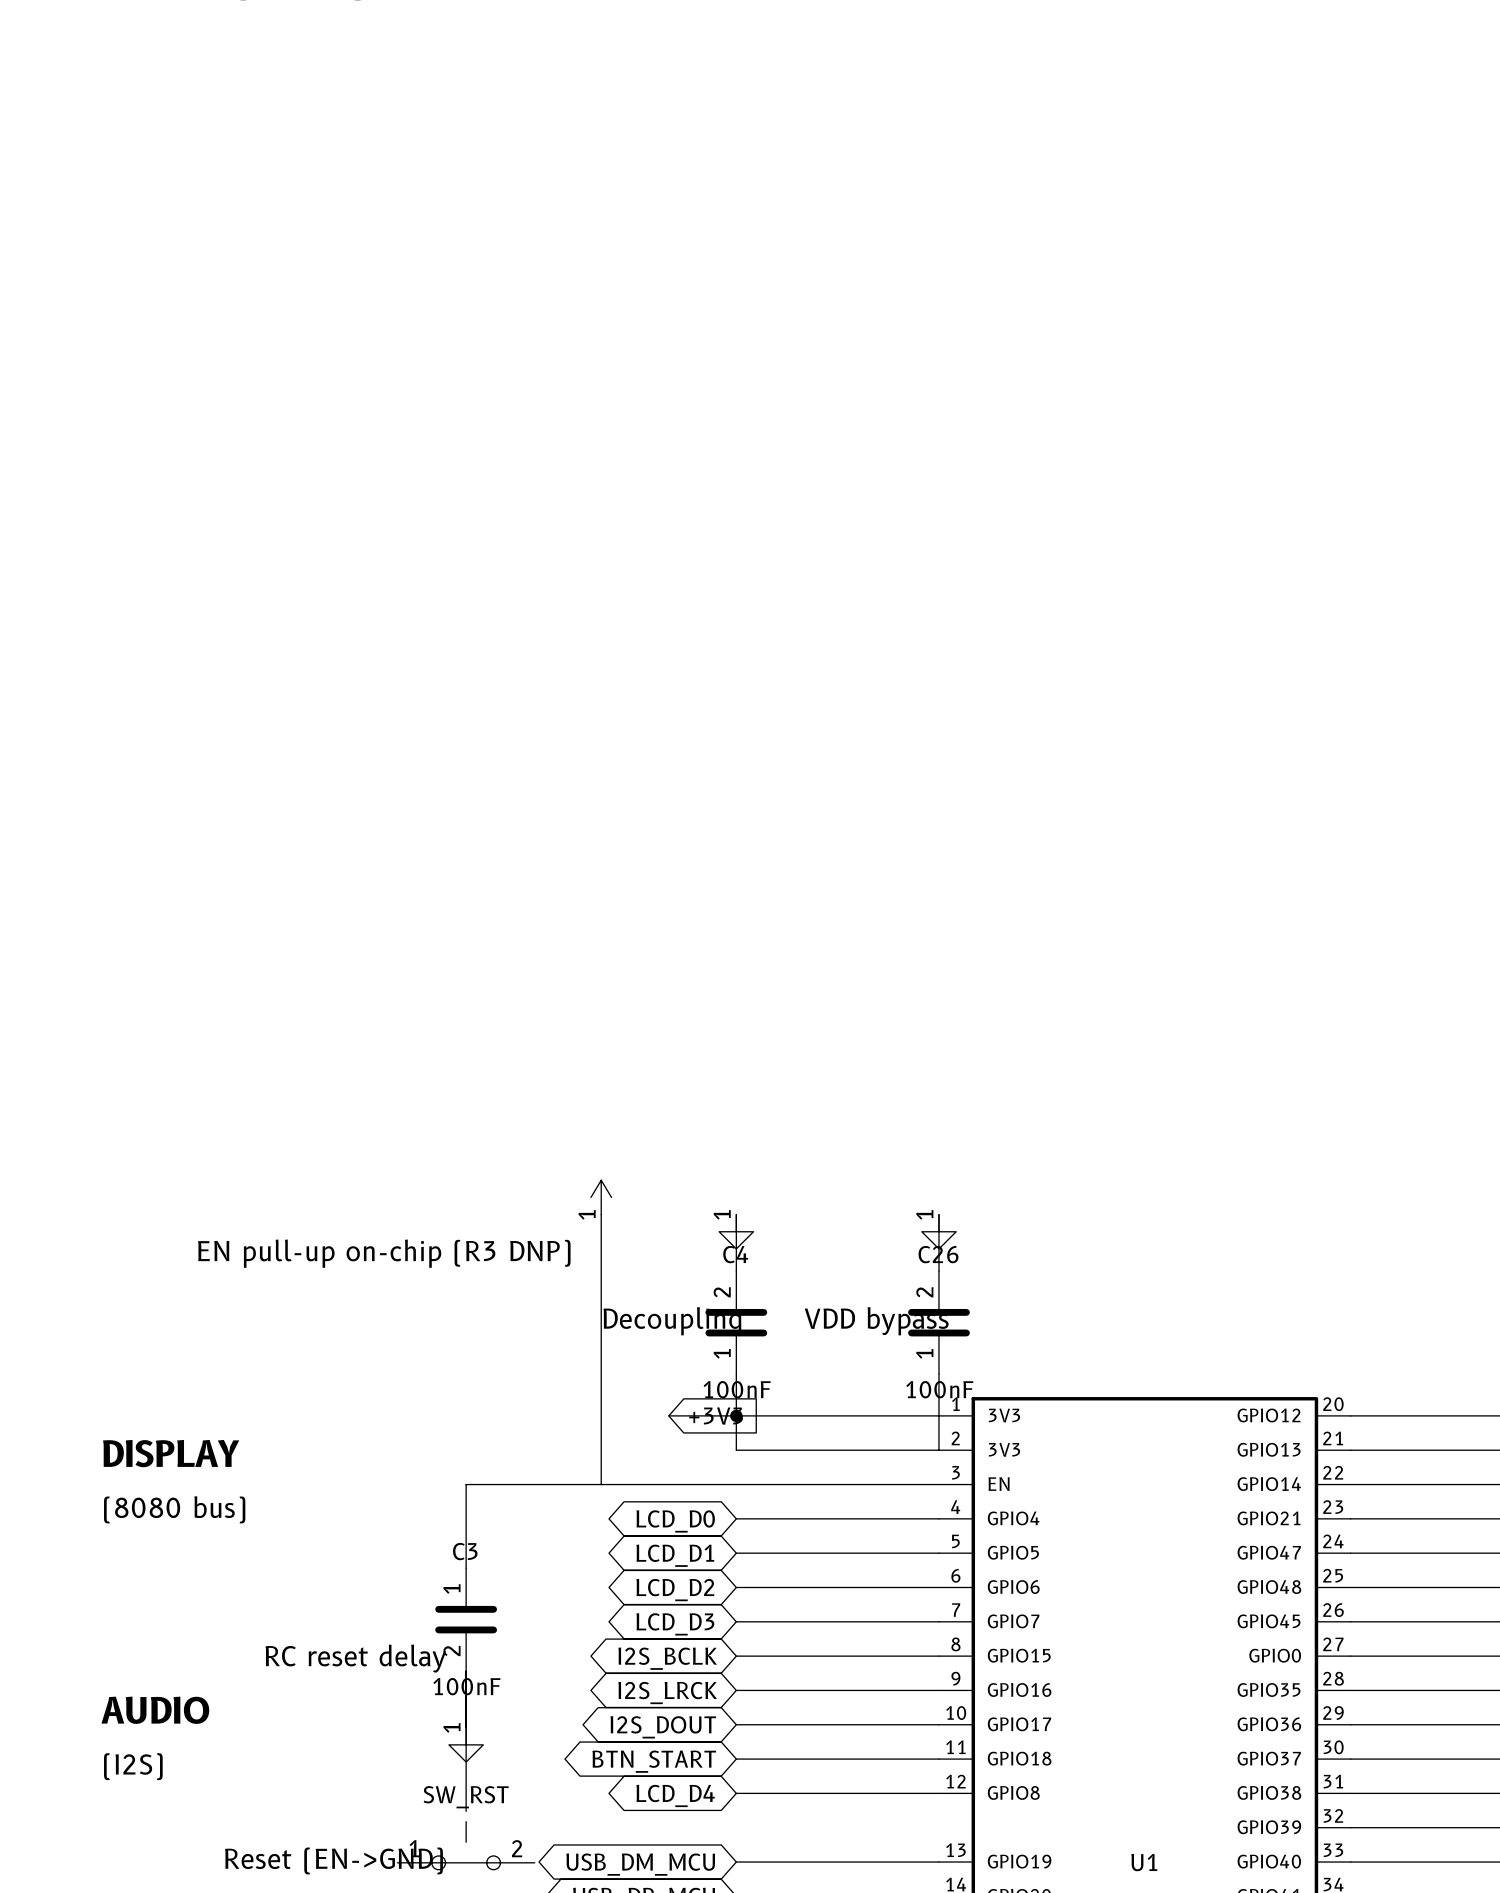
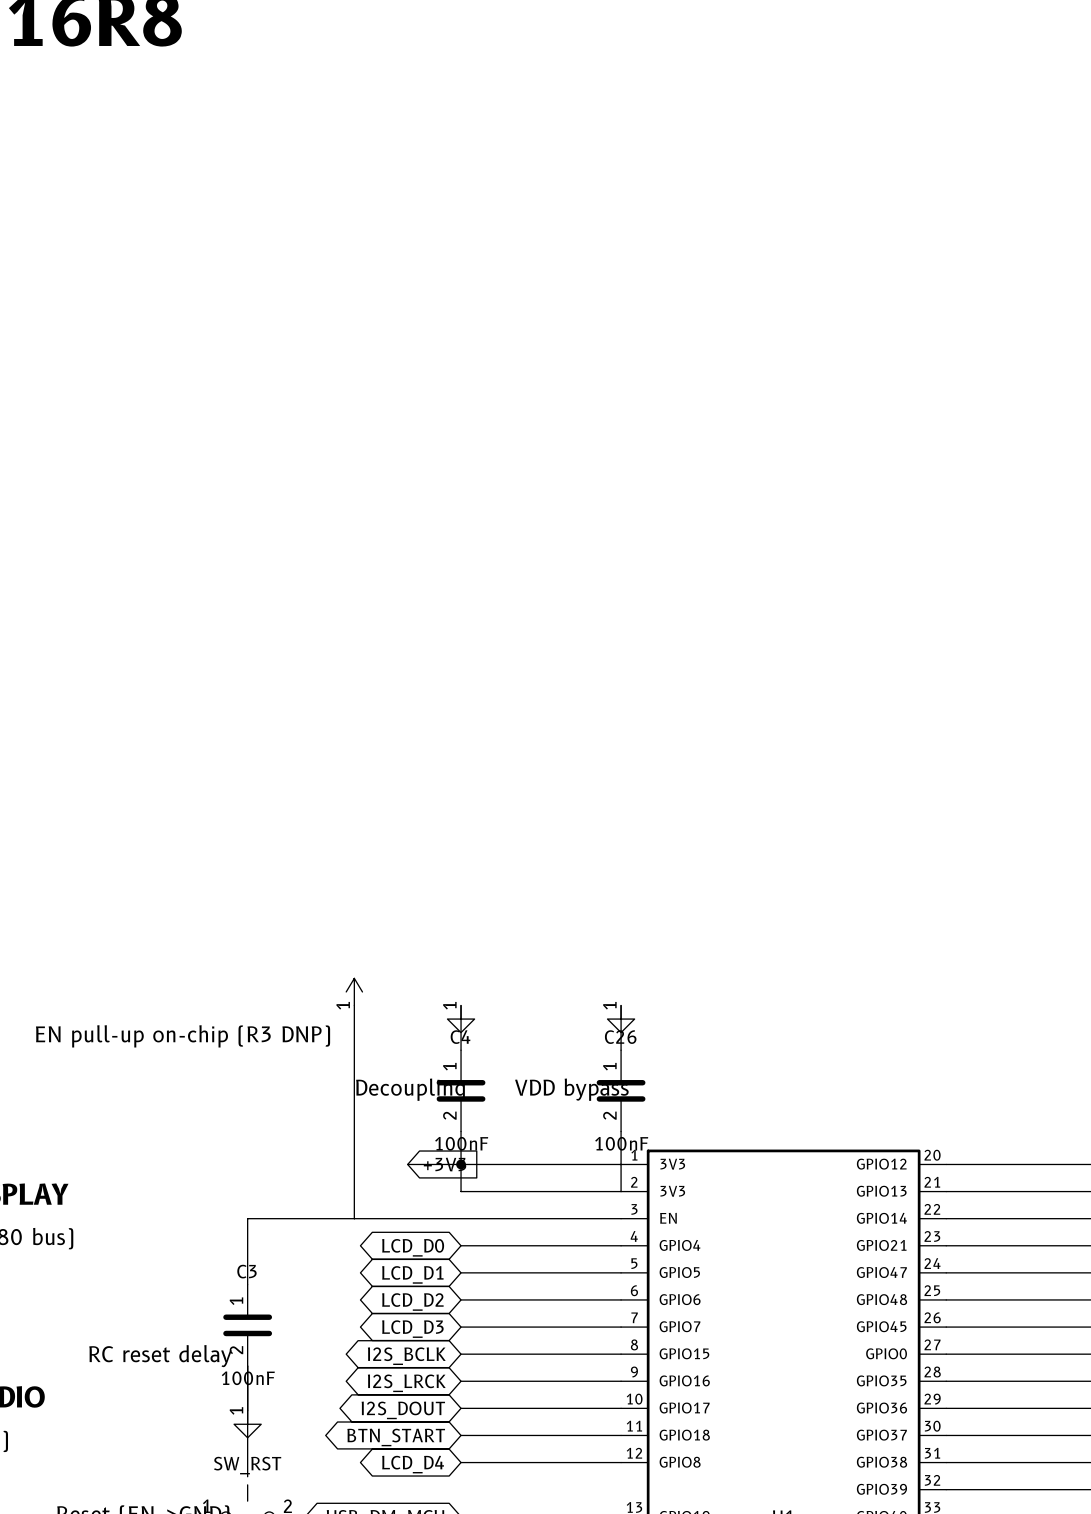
C4 rotation: 0° (736, 1322) -> 180° (461, 1090)
C26 rotation: 0° (938, 1322) -> 180° (621, 1090)

